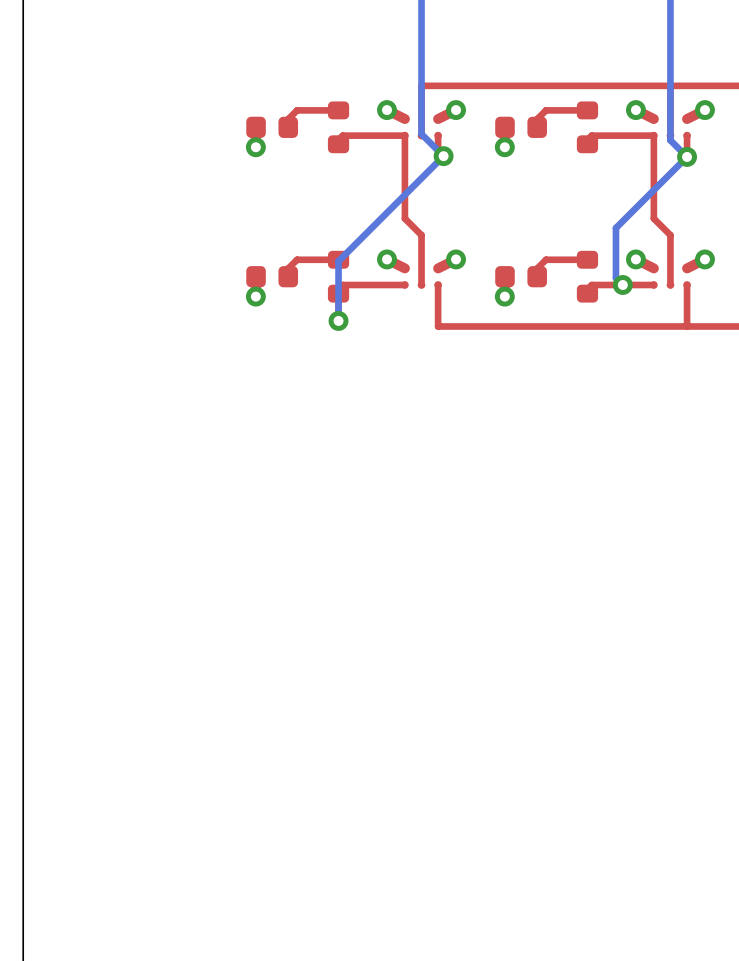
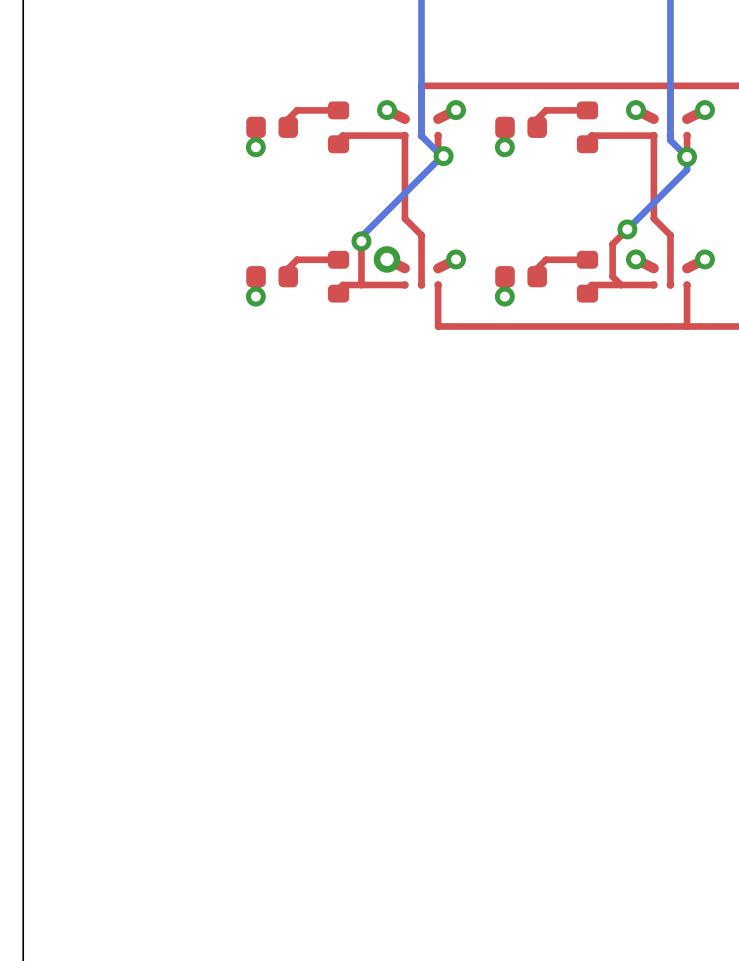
bottom track: (421, 134) (443, 156) (338, 261) (338, 320) -> (421, 134) (441, 156) (361, 236) (361, 241)
bottom track: (687, 156) (615, 228) (615, 278) (622, 284) -> (687, 156) (687, 169) (627, 229)
top track: none -> (627, 229) (612, 244) (612, 276) (620, 284)
top track: none -> (361, 241) (361, 284)
via position: (386, 259) -> (361, 241)
via: none -> (386, 259)
via position: (622, 284) -> (627, 229)
via: (338, 320) -> none

